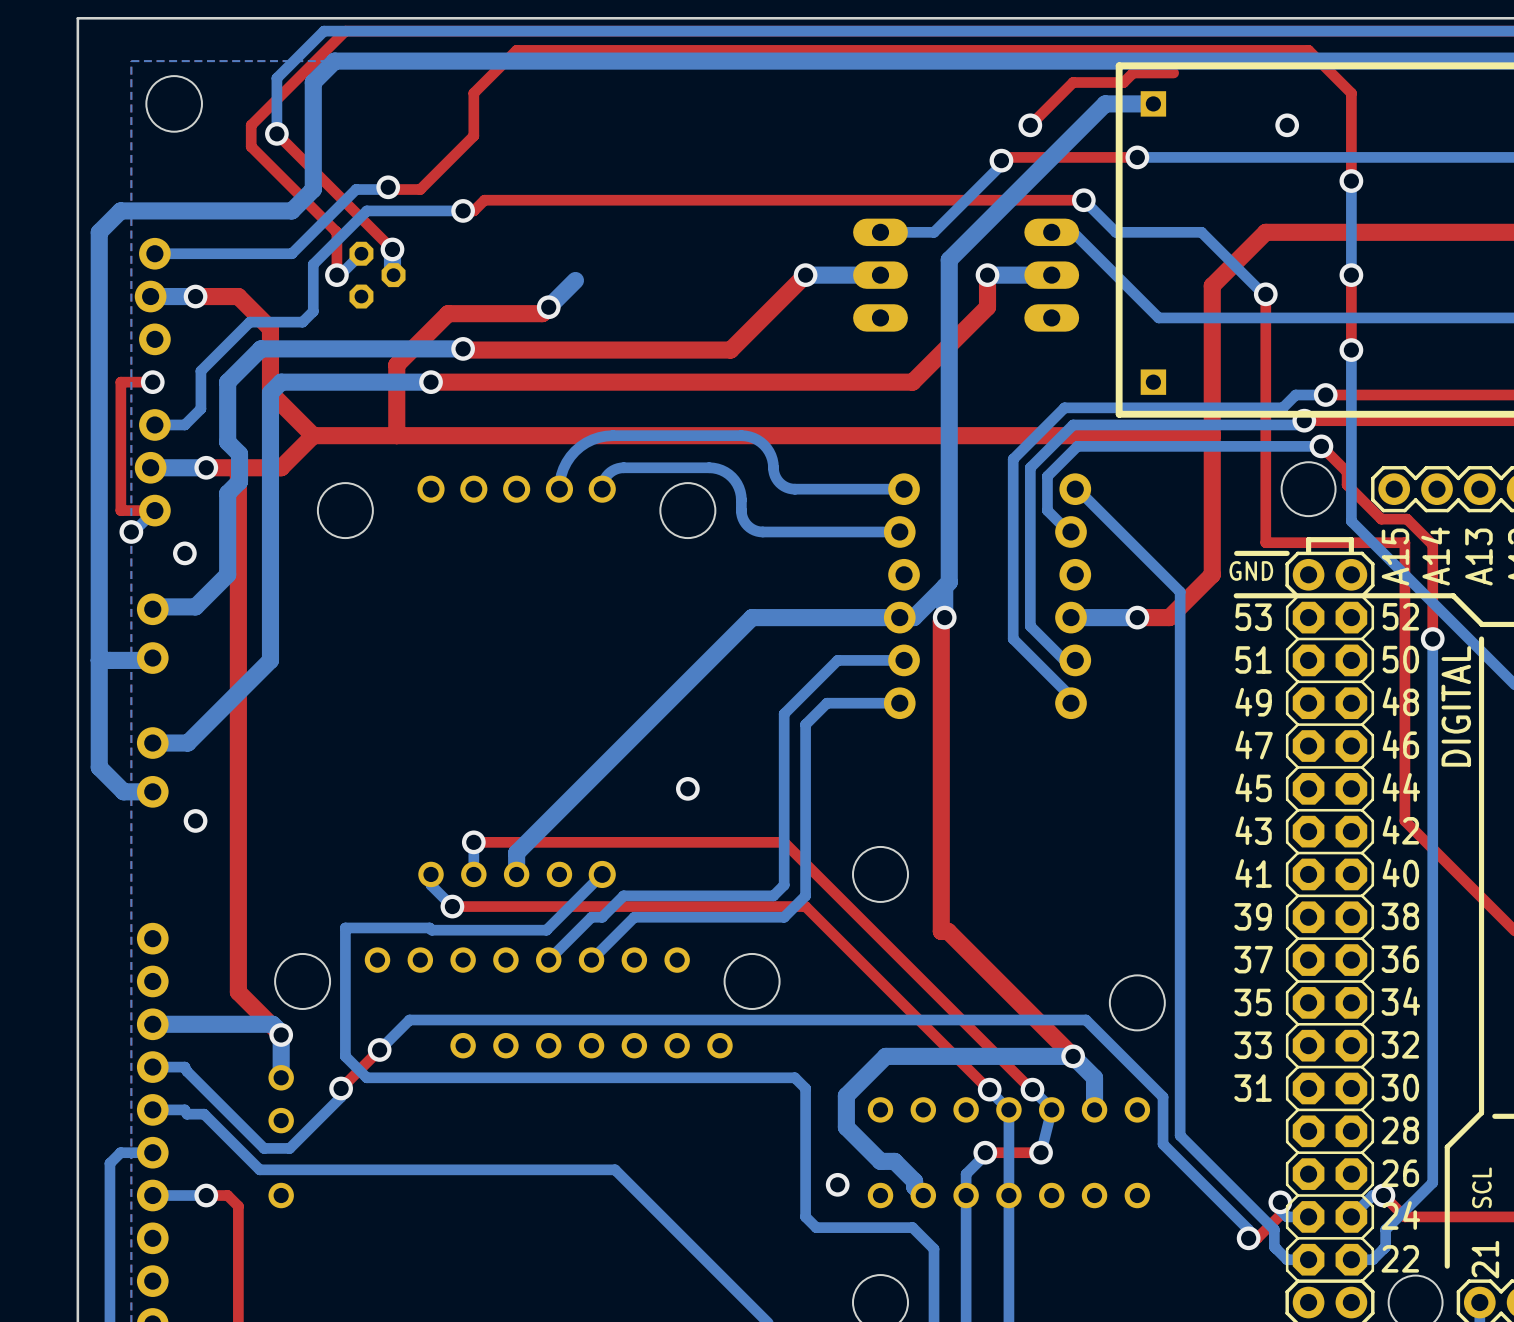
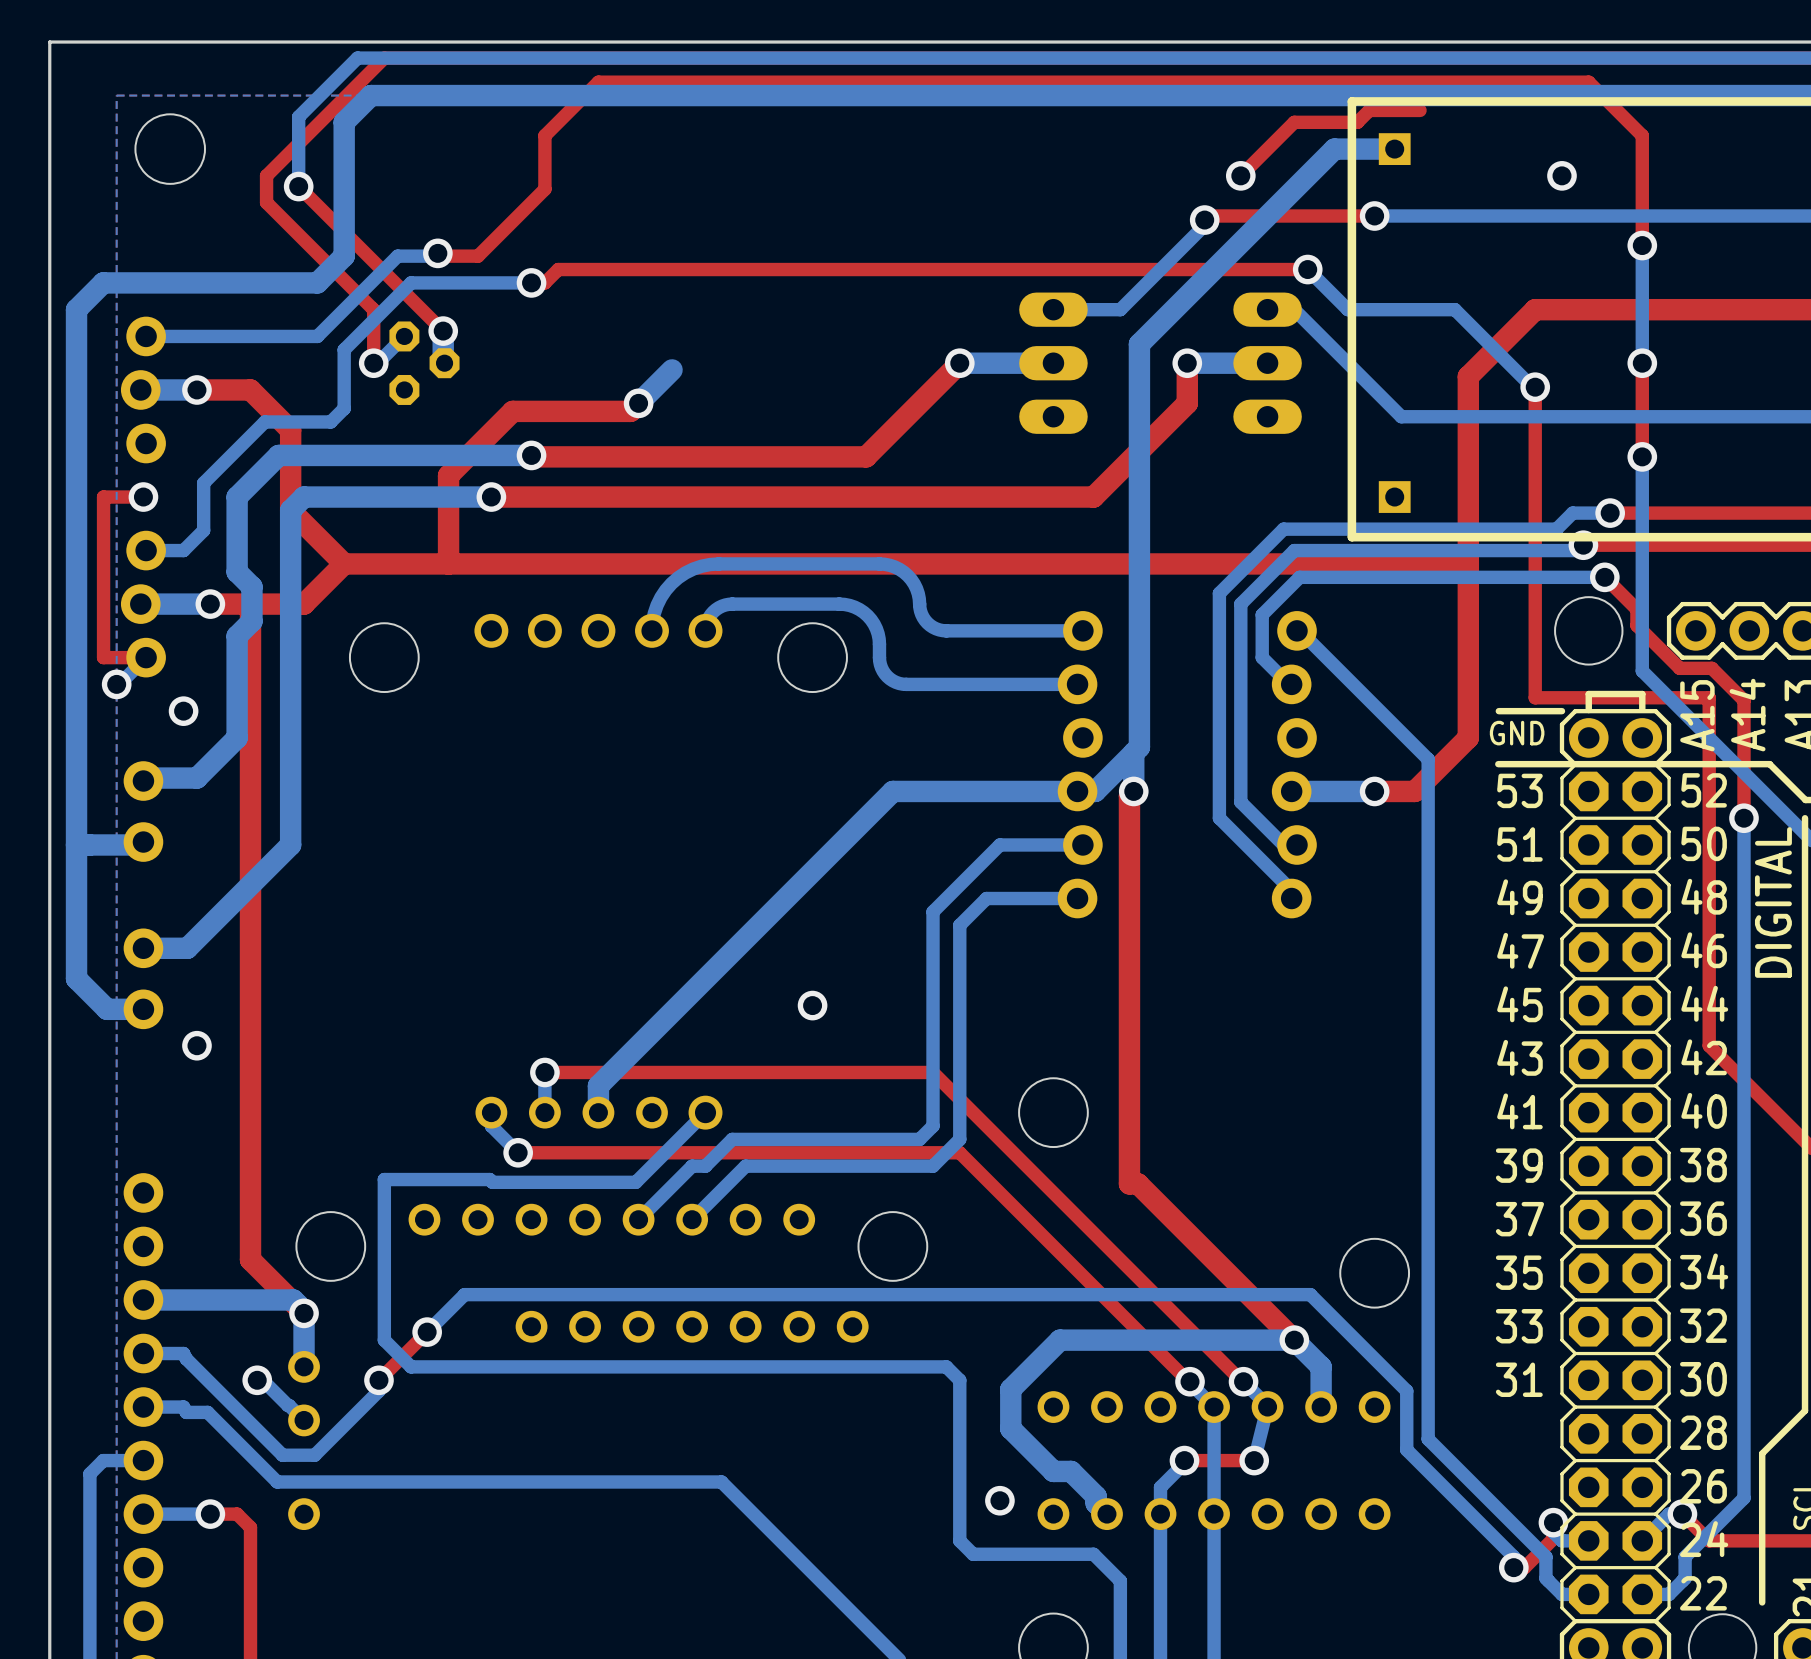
bottom track: none -> (257, 1380) (263, 1380) (304, 1420)
via: none -> (257, 1380)

